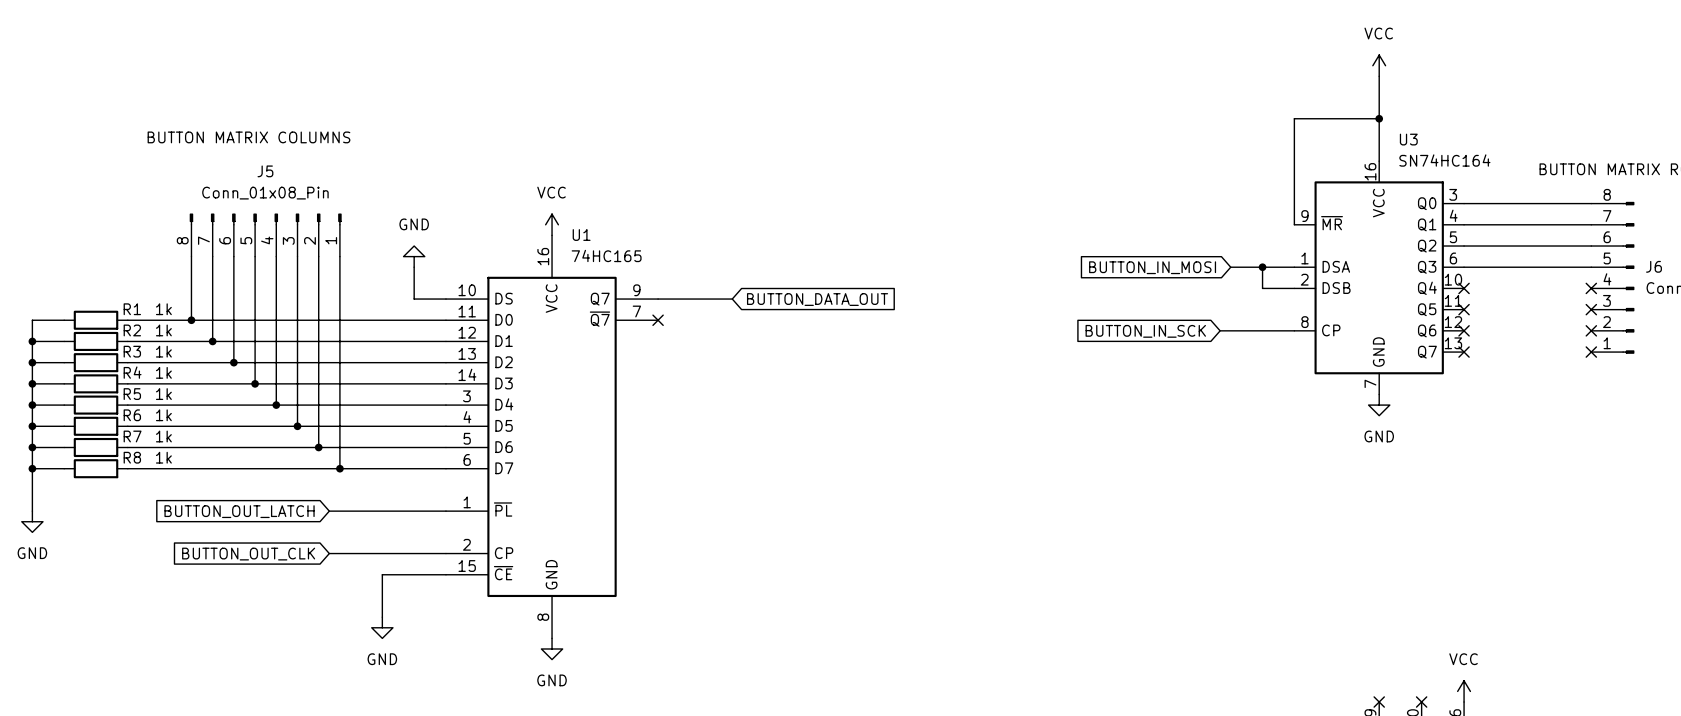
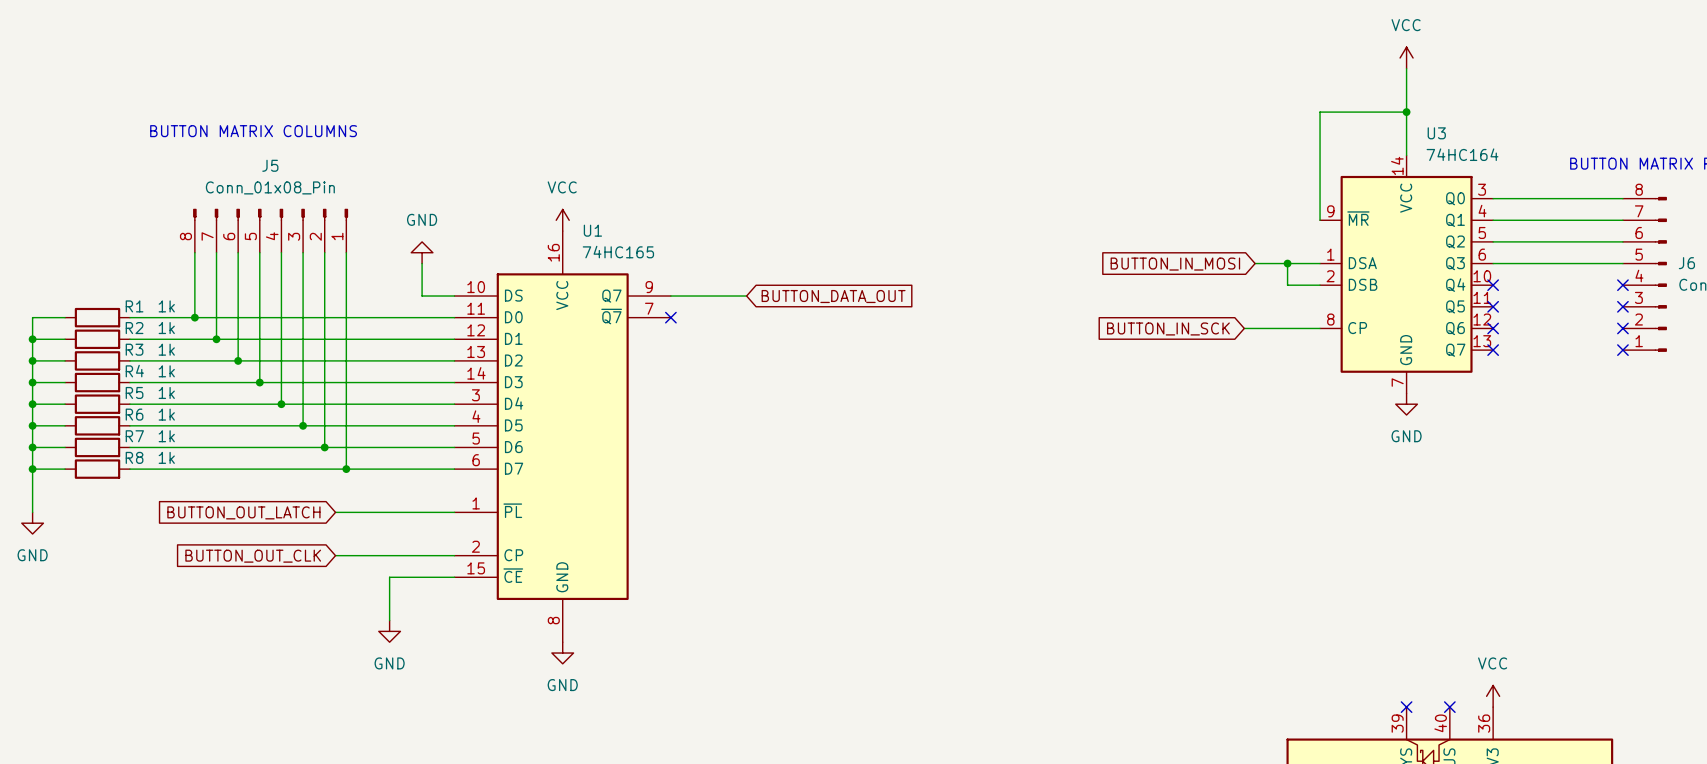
U3 value: SN74HC164 (1444, 160) -> 74HC164 (1462, 154)
U3 pin number: 16 (1370, 171) -> 14 (1397, 165)

